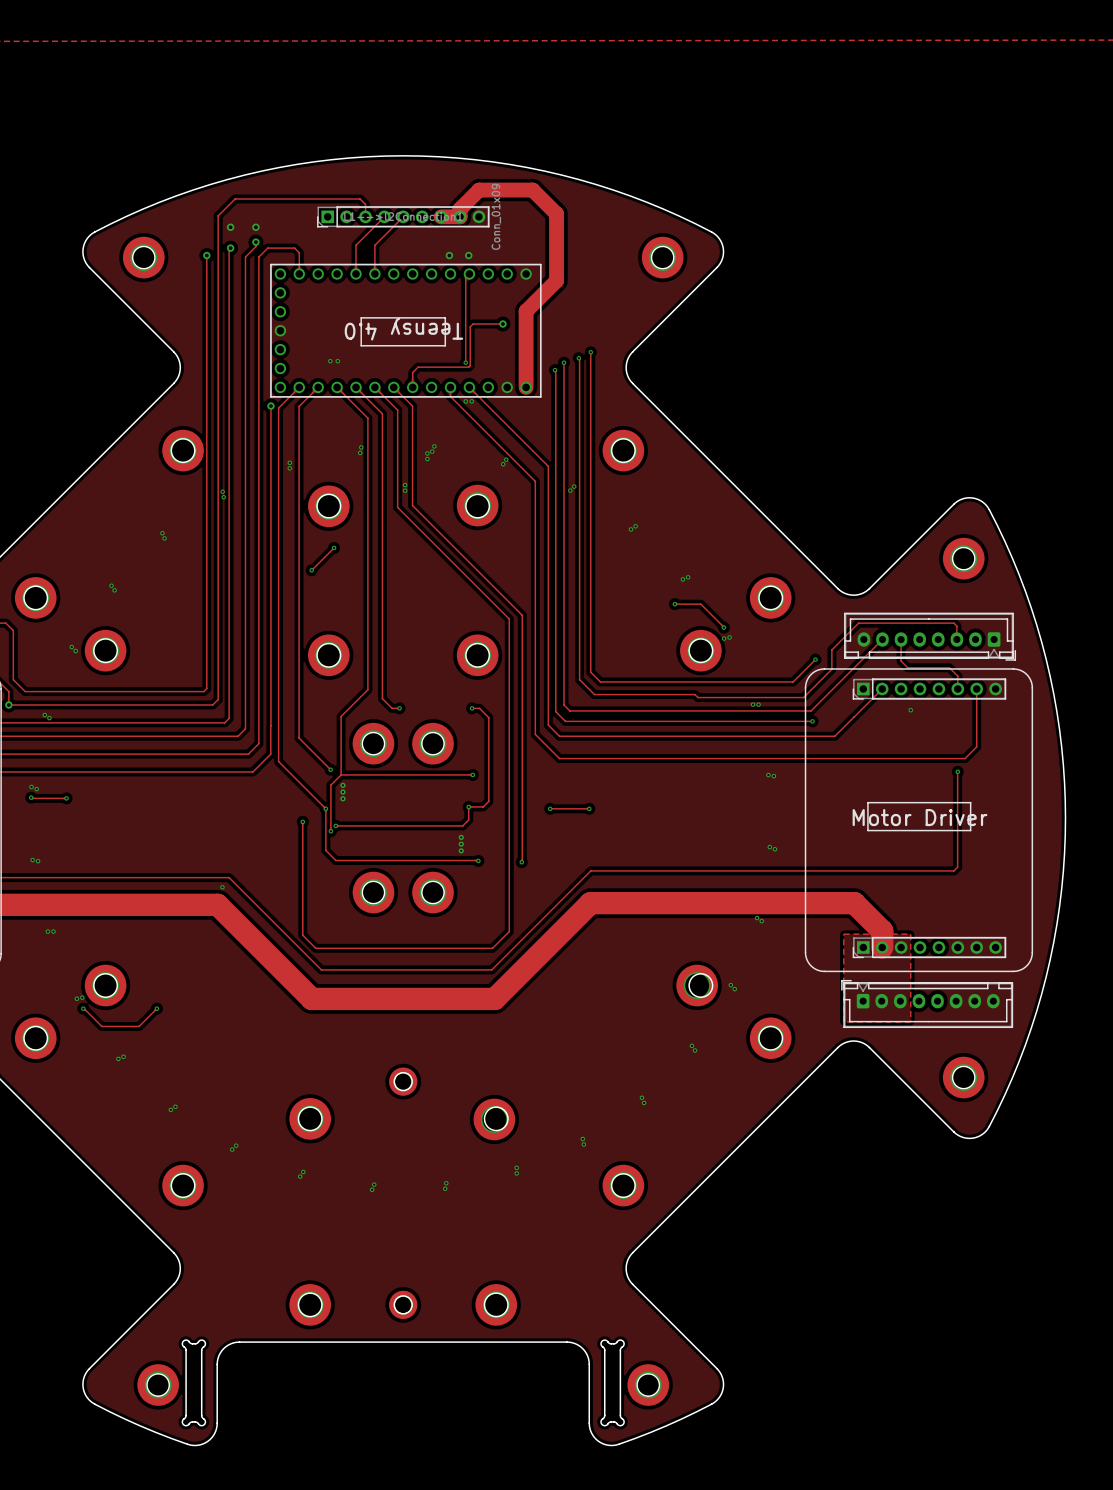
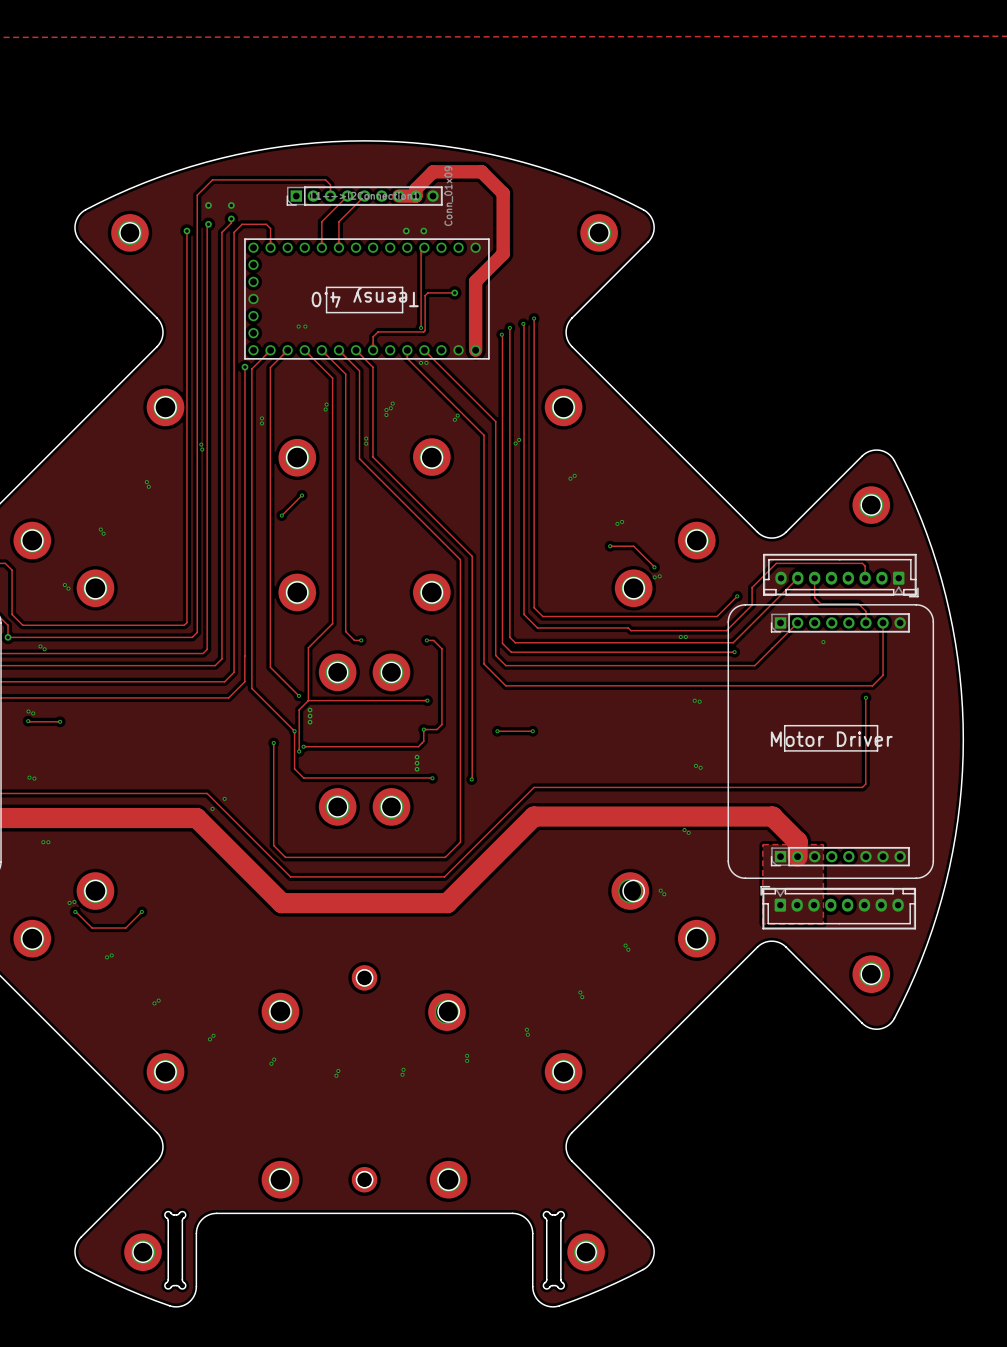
via: none -> (224, 798)
via: (222, 887) -> none
via: none -> (212, 808)

